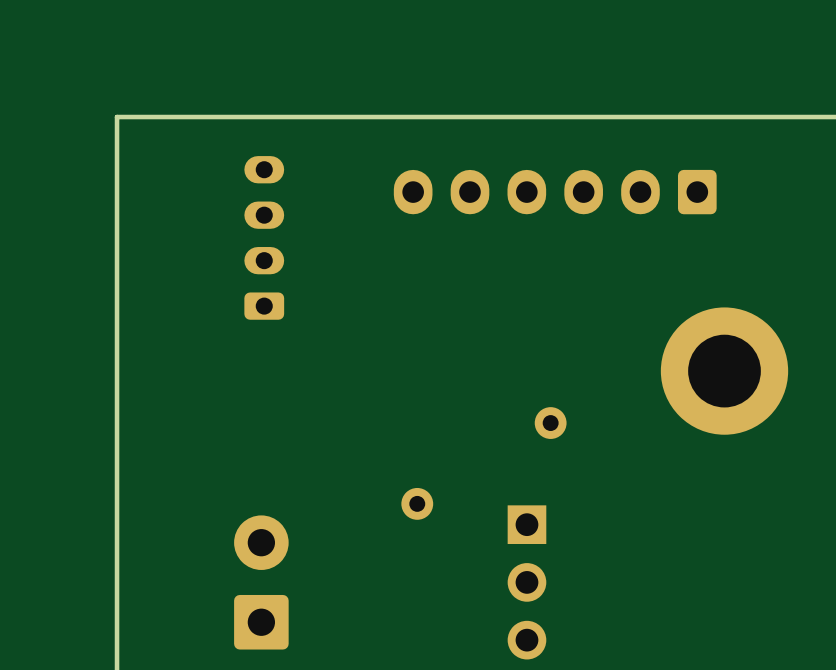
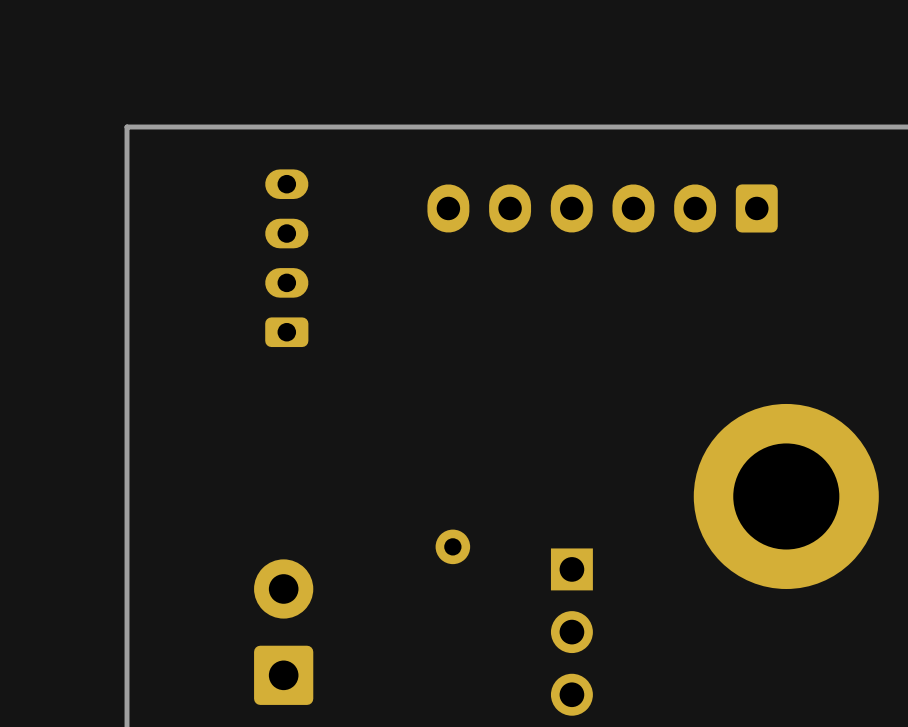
part: (724, 371) -> none
part: (550, 423) -> none
part: none -> (786, 496)

